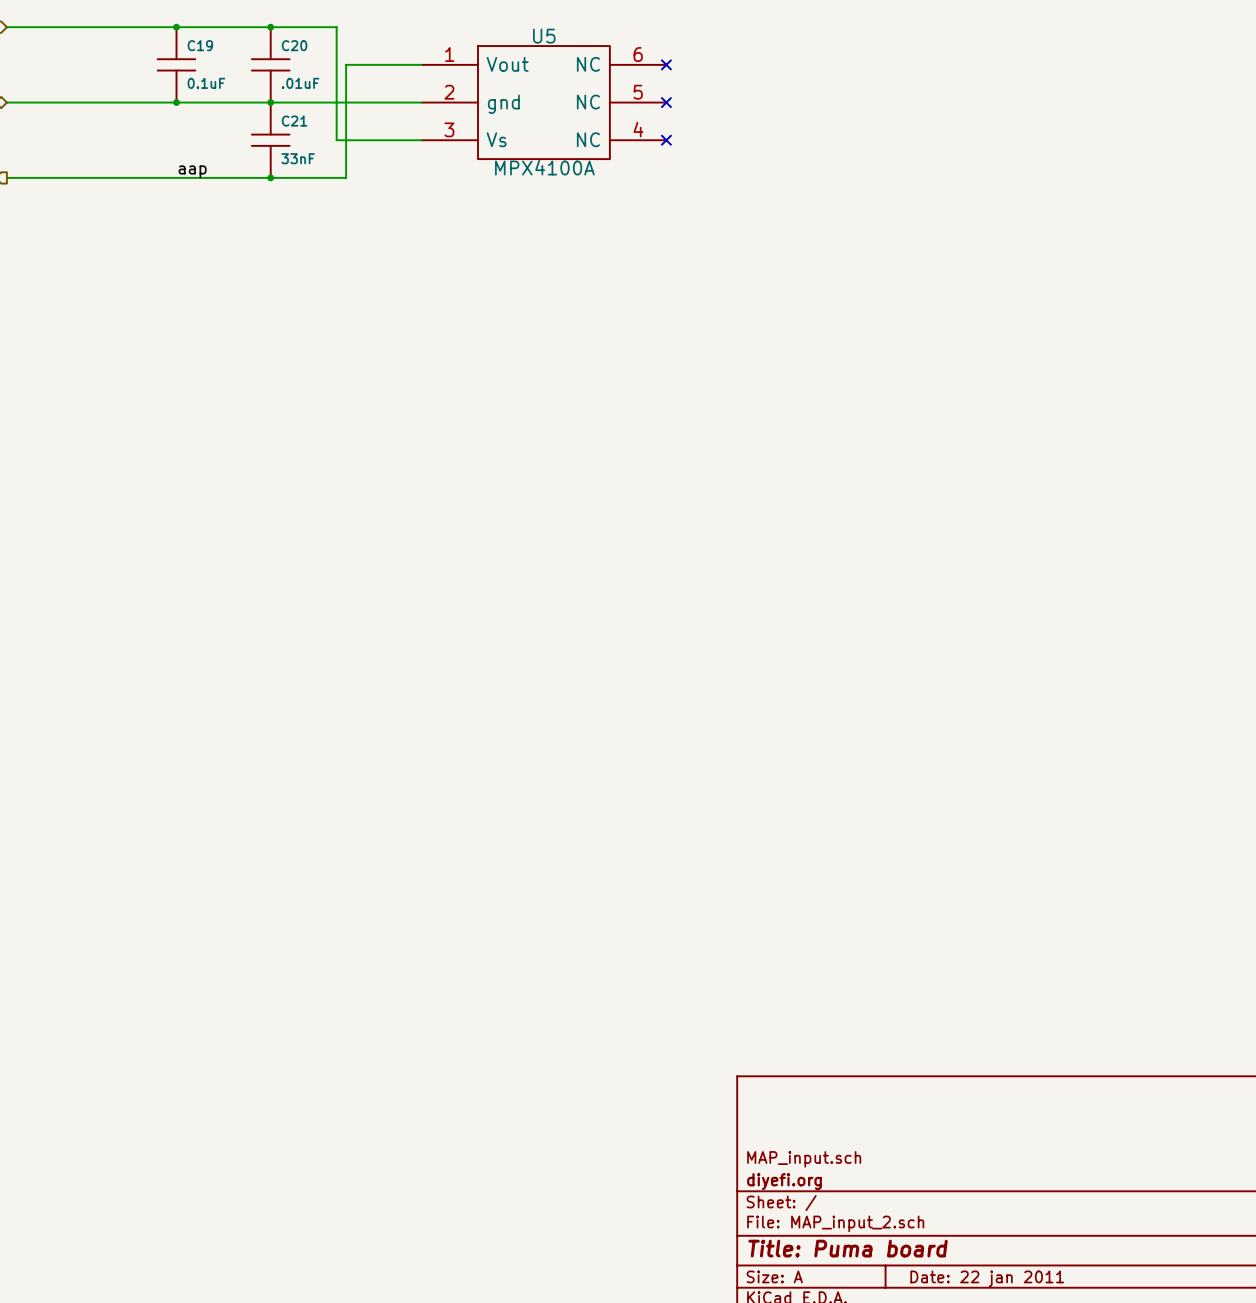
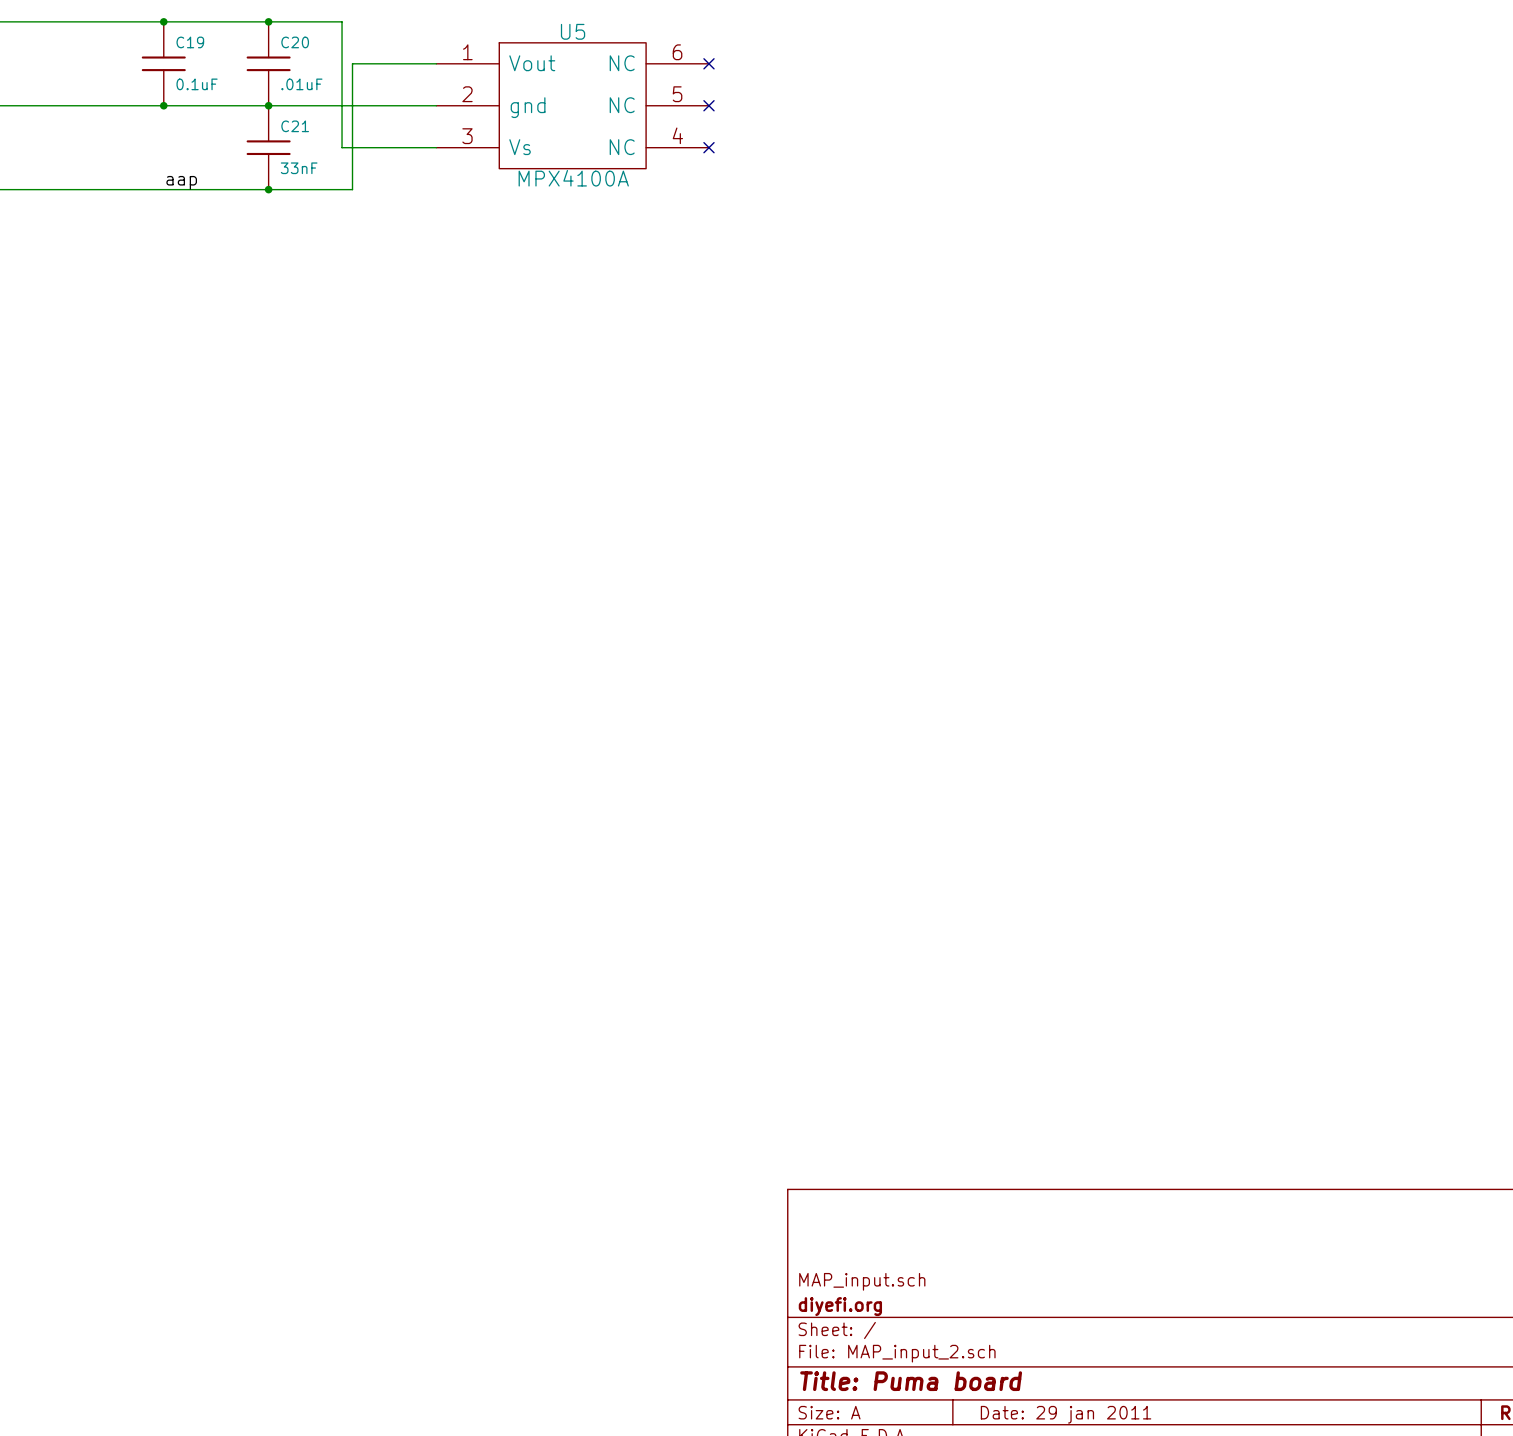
title block: Date: 22 jan 2011 (987, 1278) -> Date: 29 jan 2011 (1066, 1414)

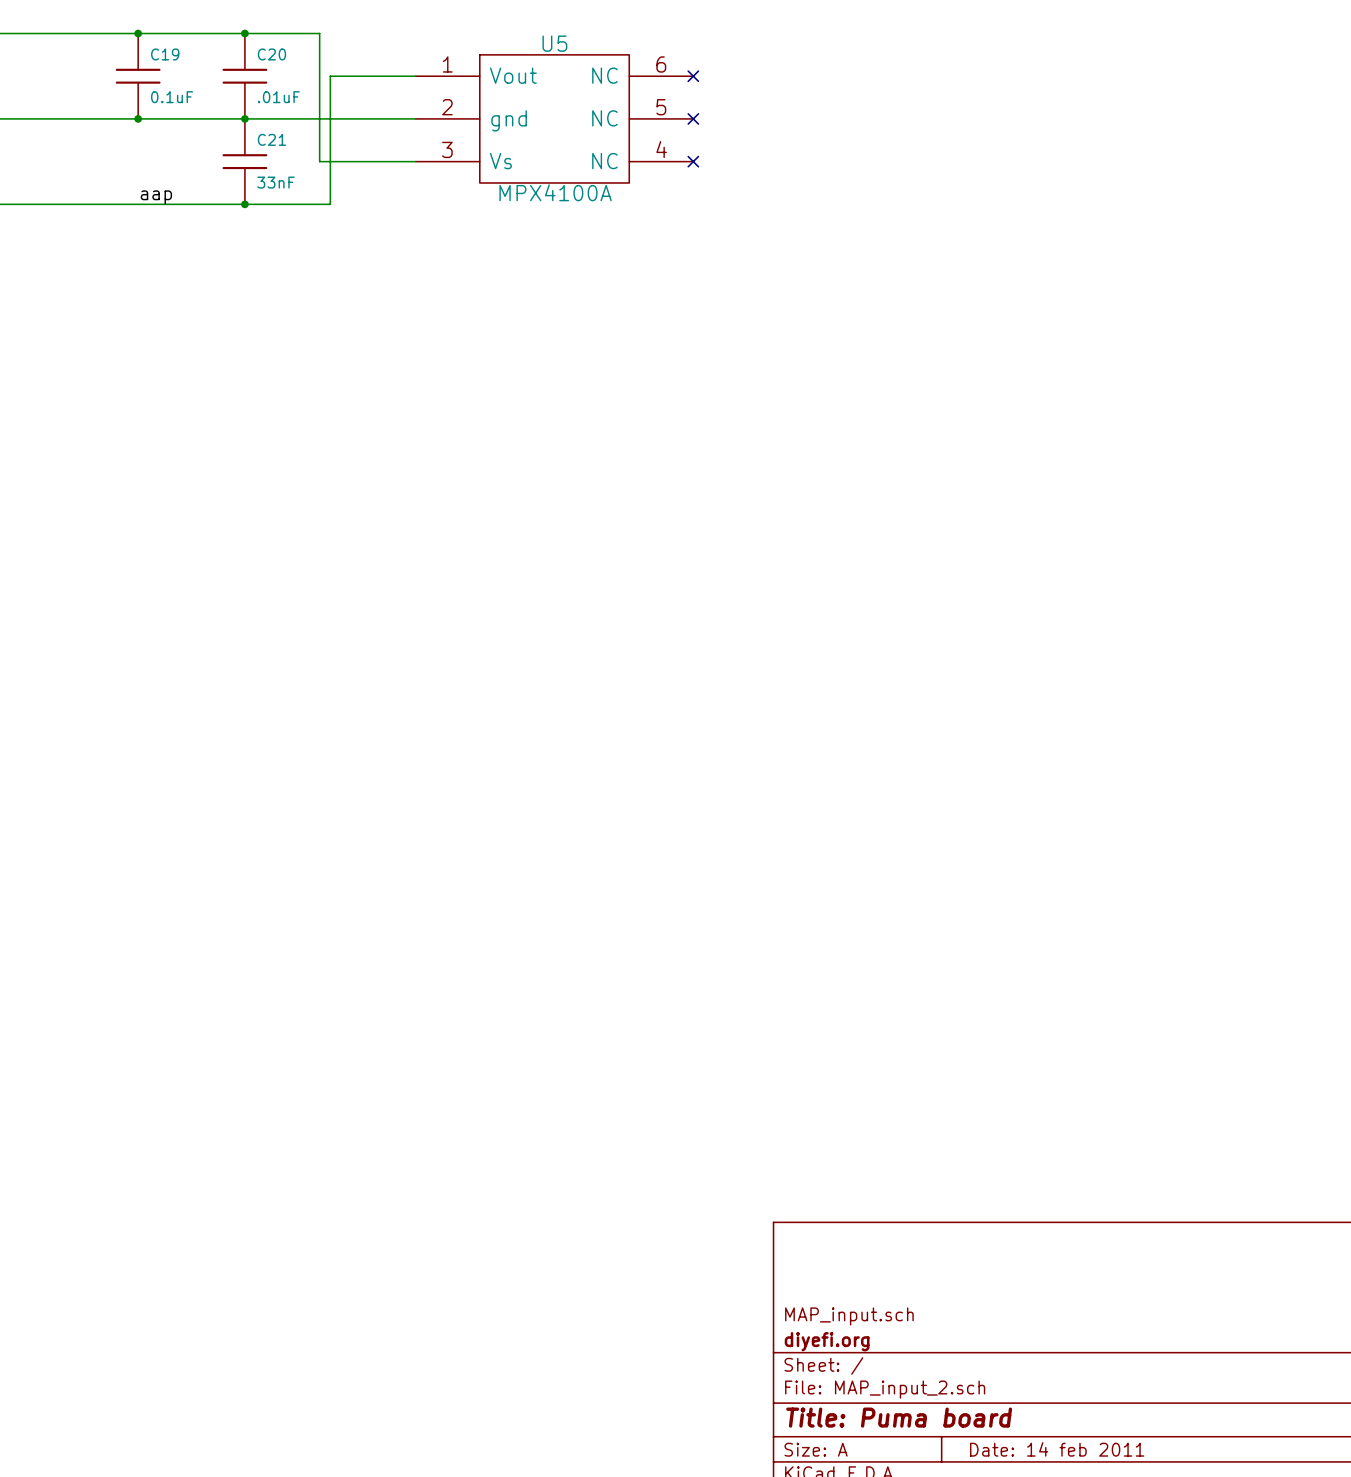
title block: Date: 29 jan 2011 (1066, 1414) -> Date: 14 feb 2011 (1057, 1449)

